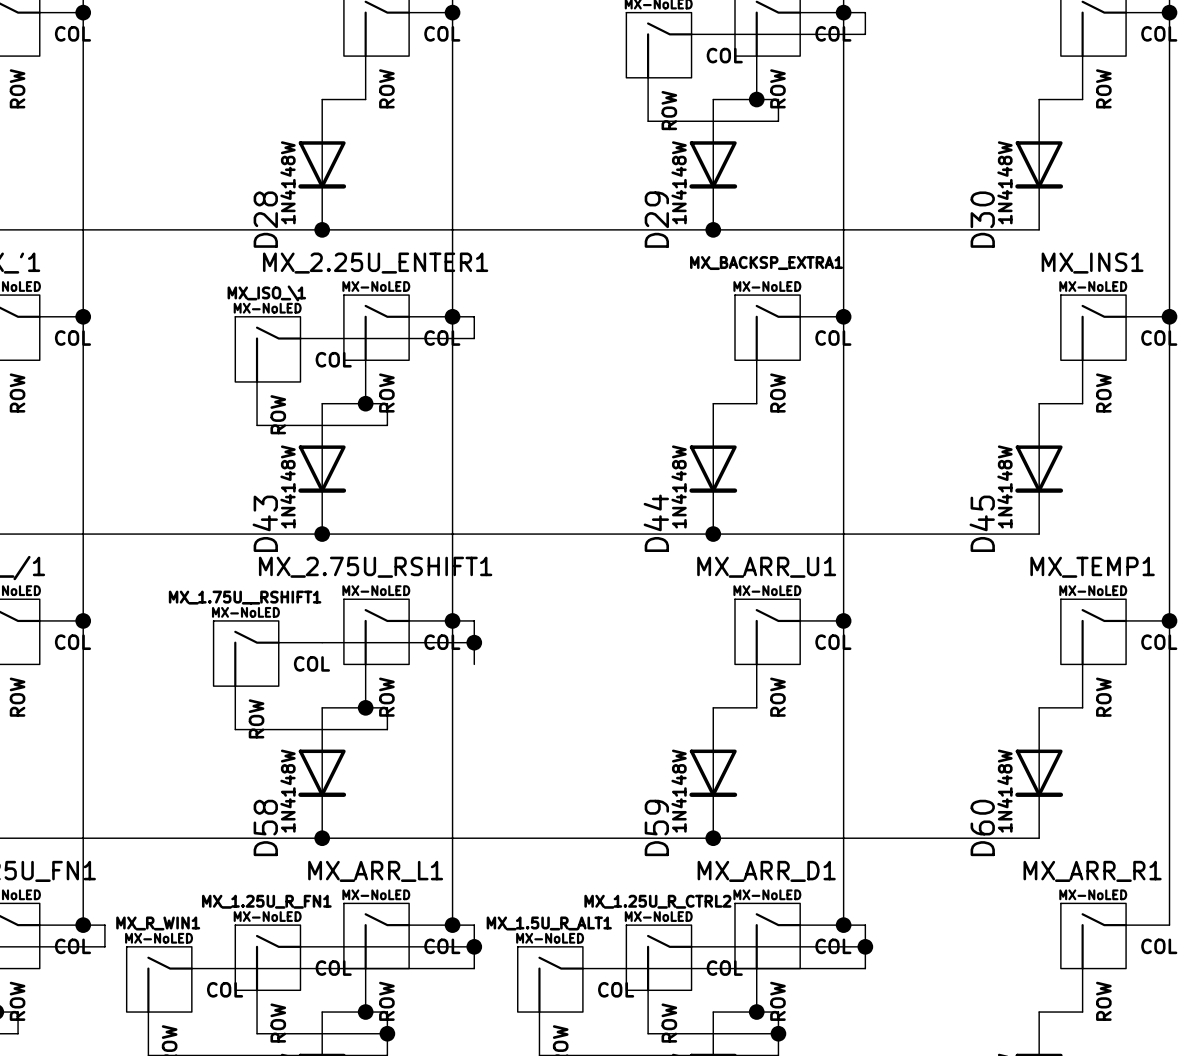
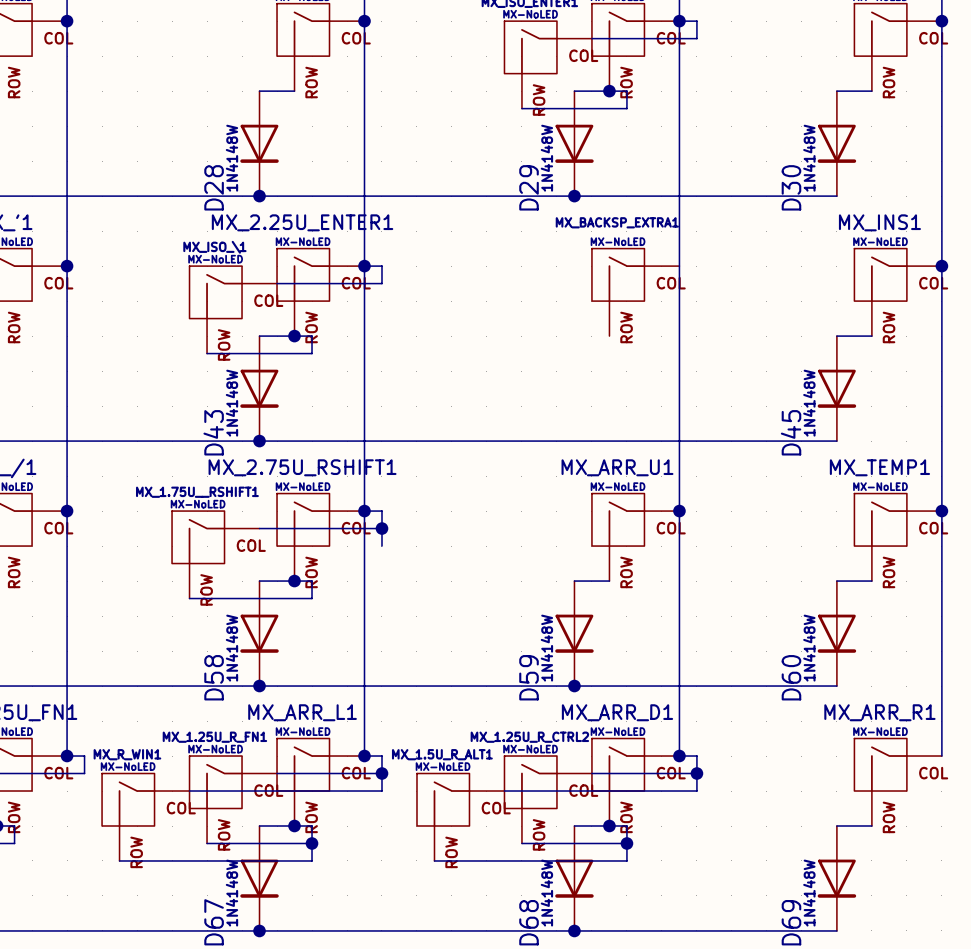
junction: (843, 316) -> none
wire: (713, 403) (756, 403) -> none
D44: 1N4148W (713, 468) -> none
junction: (713, 534) -> none

